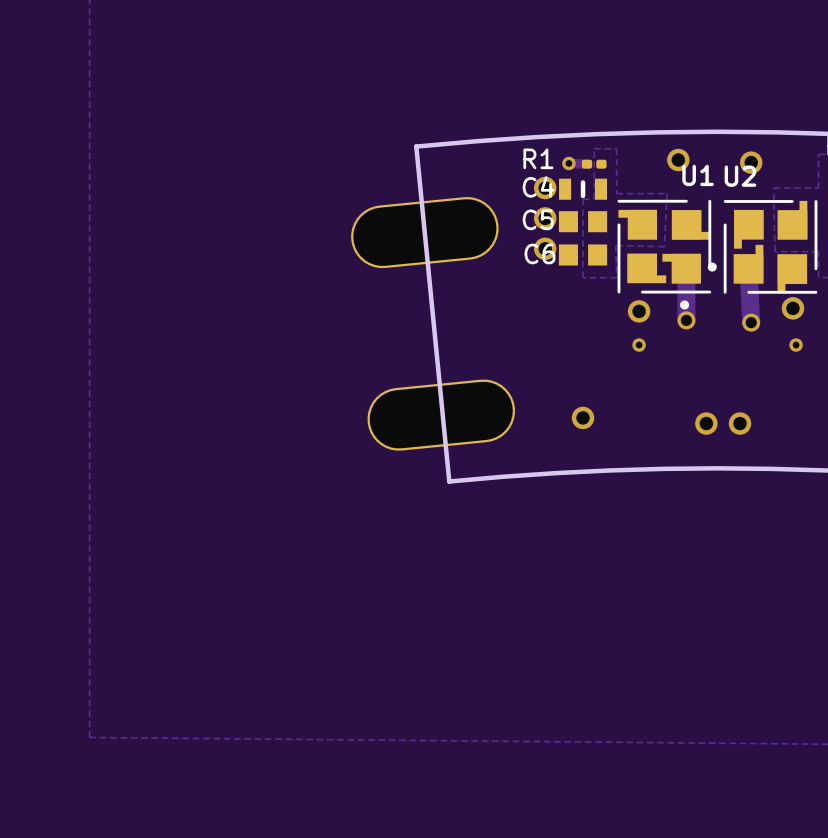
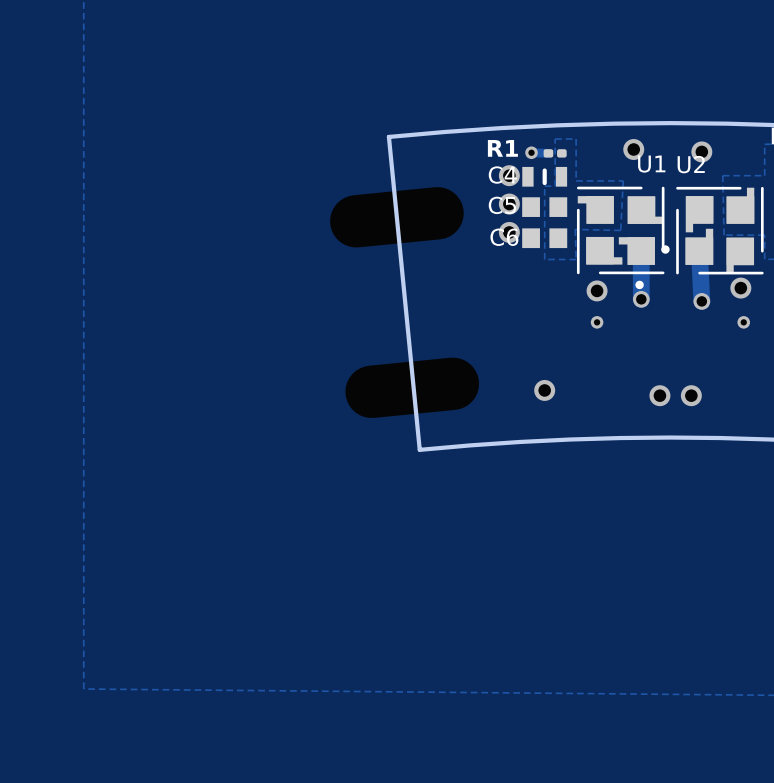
part footprint: [351, 197, 499, 269] -> [330, 187, 464, 248]
part footprint: [367, 379, 516, 451] -> [345, 357, 480, 419]

